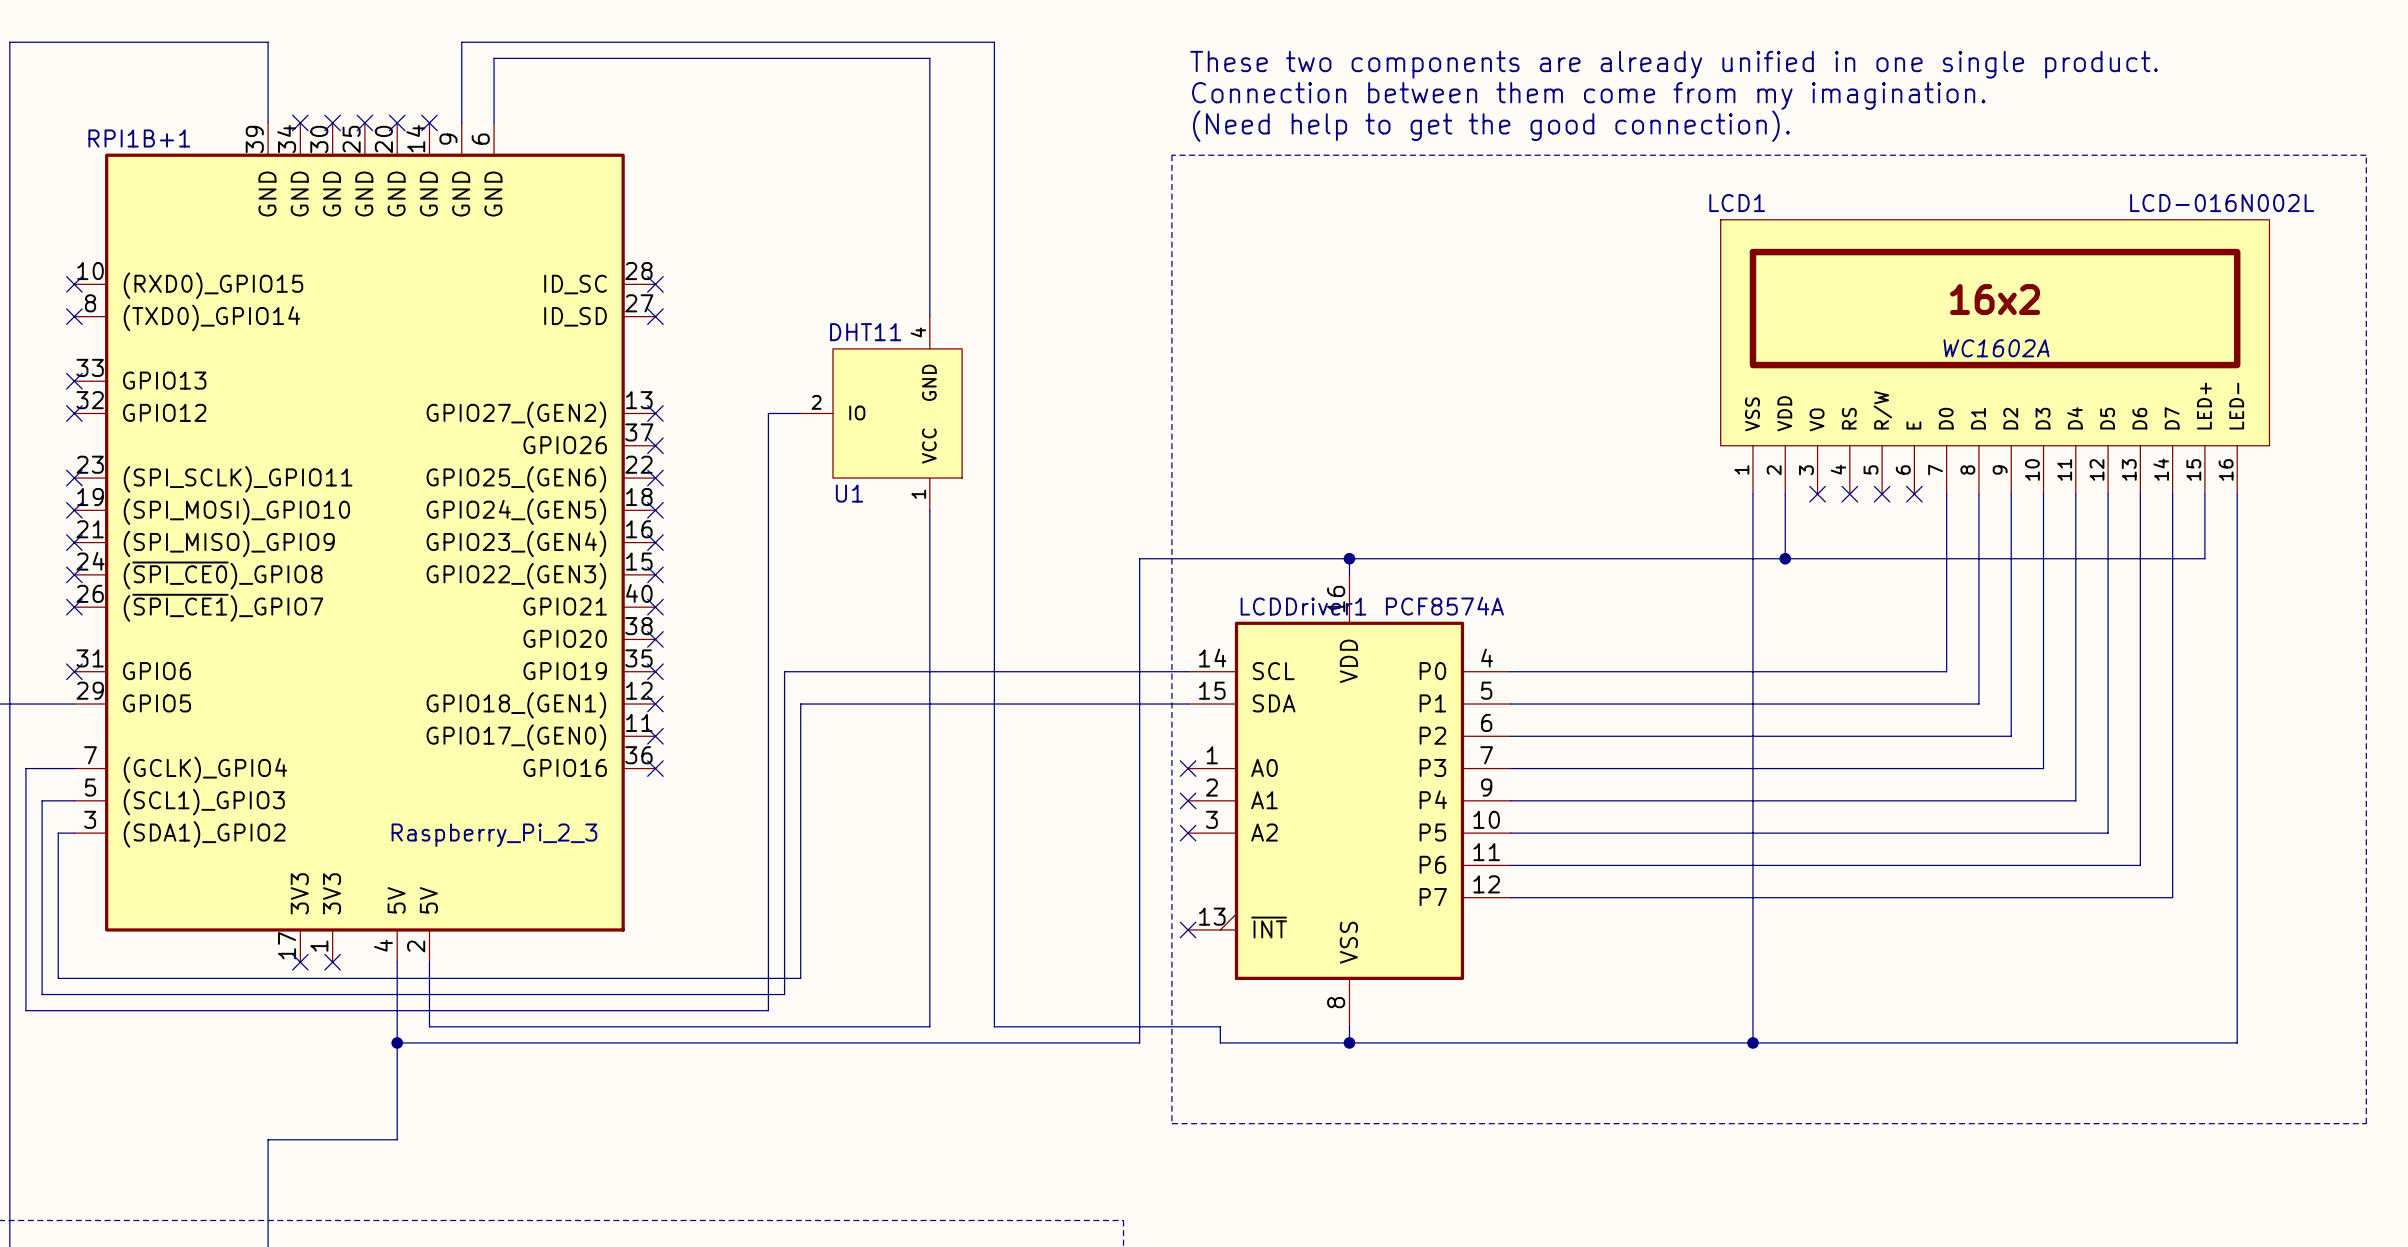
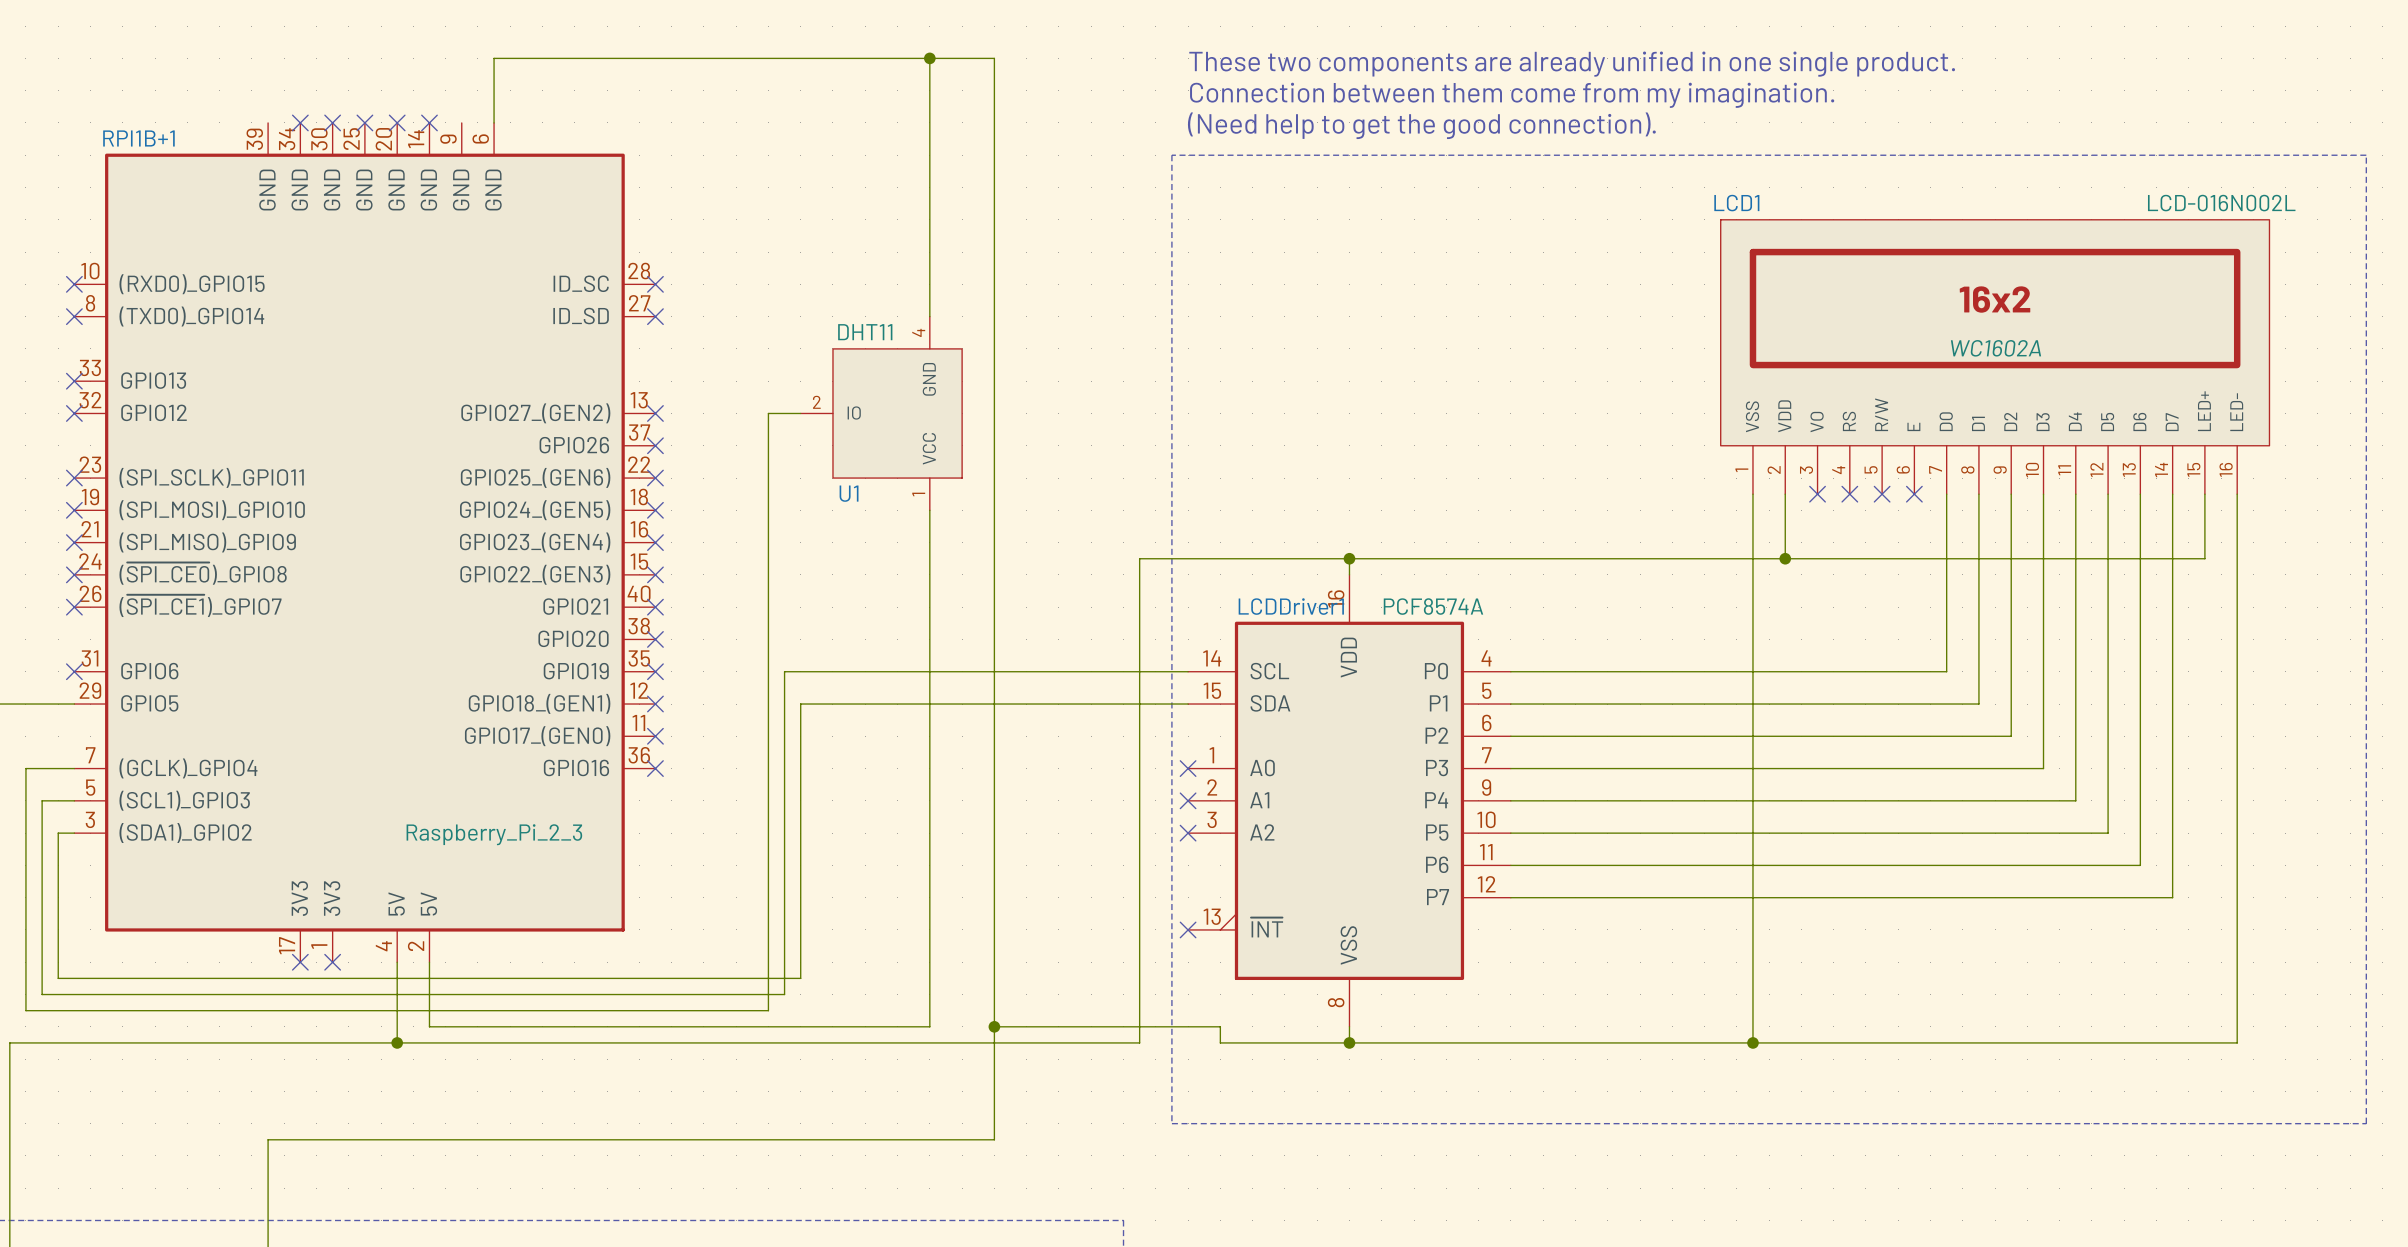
junction: none -> (929, 58)
wire: (994, 58) (994, 42) (461, 42) (461, 122) -> (994, 58) (929, 58)
wire: (268, 122) (268, 42) (9, 42) (9, 1042) -> none
wire: none -> (994, 1026) (994, 1139) (397, 1139)
junction: none -> (994, 1026)
wire: (397, 1042) (397, 1139) -> (397, 1042) (9, 1042)

